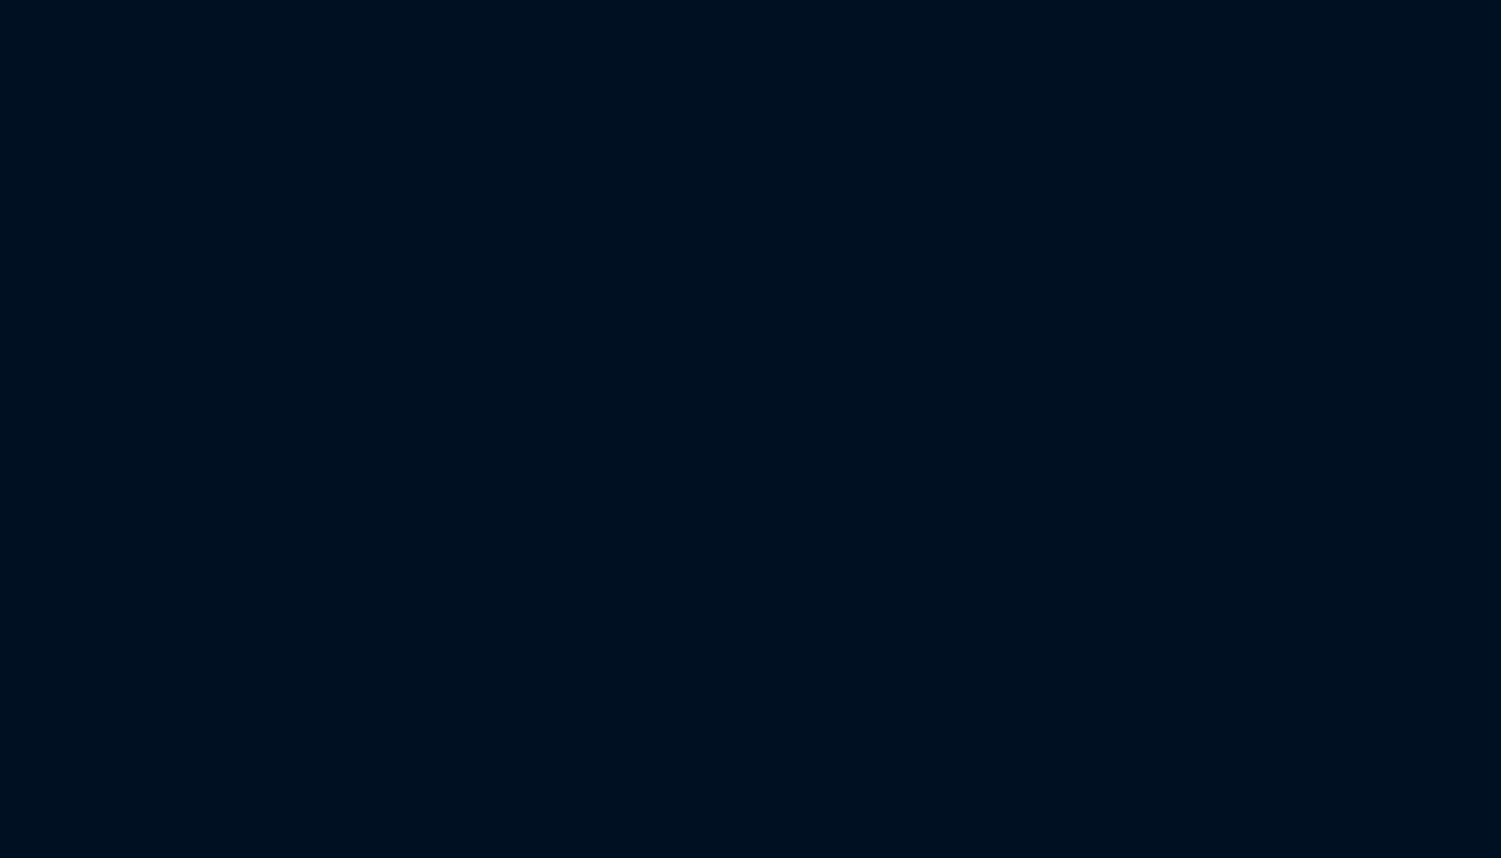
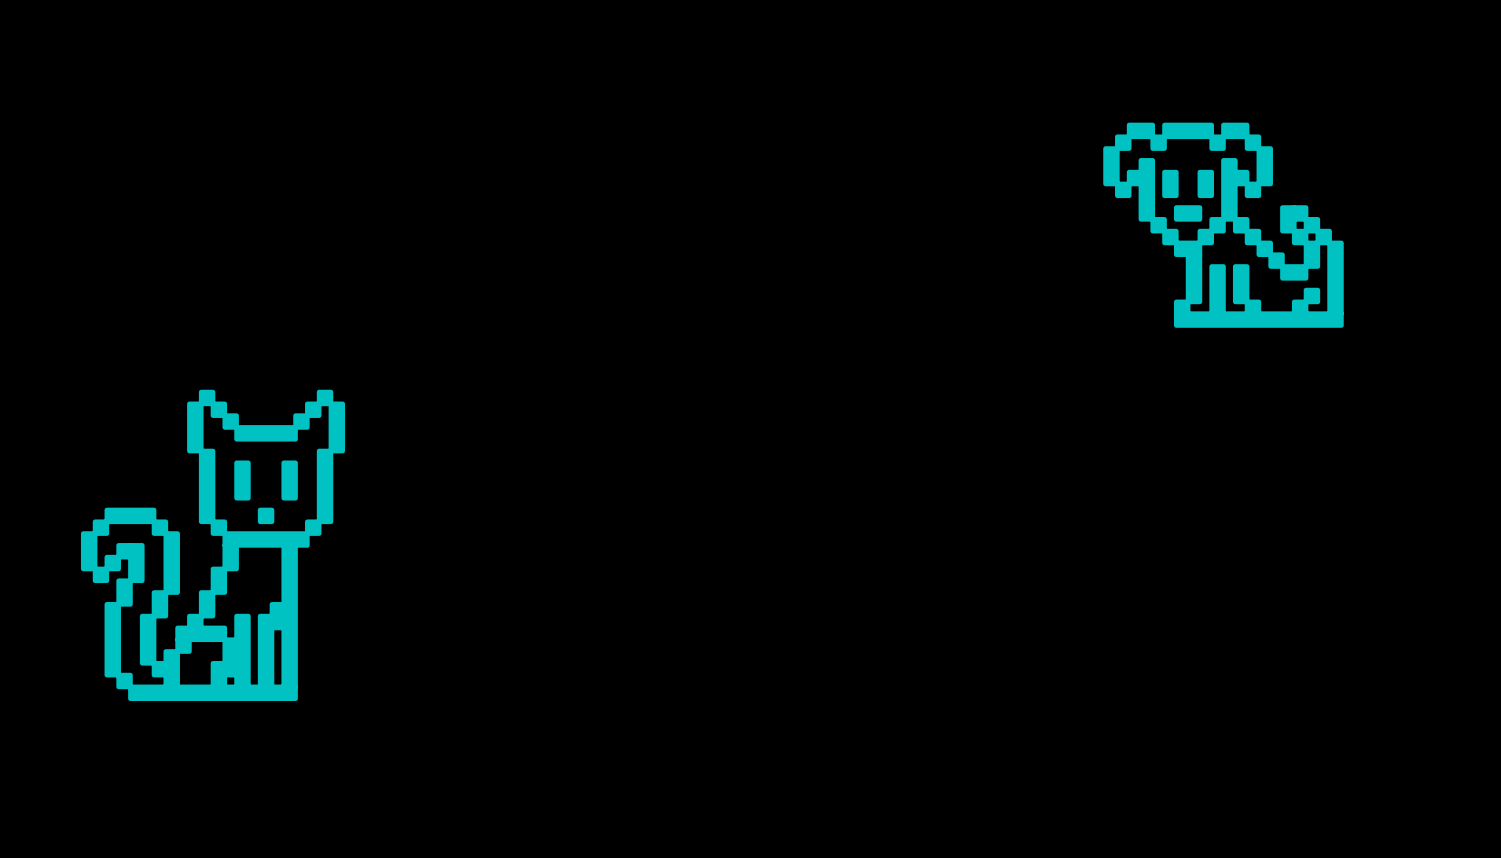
drawing: none -> [1103, 122, 1344, 328]
drawing: none -> [80, 389, 346, 701]

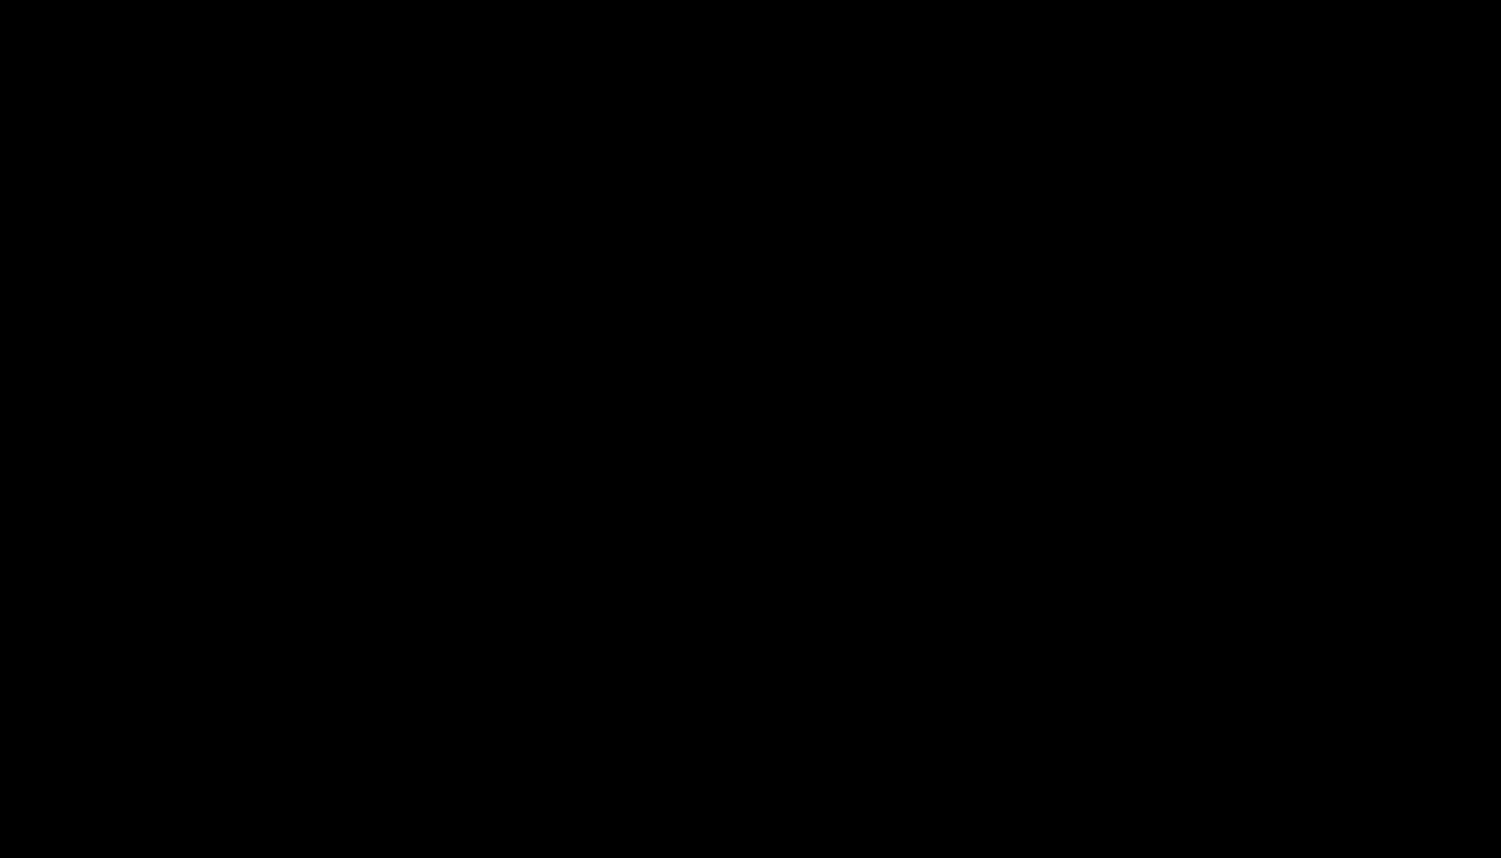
drawing: [1103, 122, 1344, 328] -> none
drawing: [80, 389, 346, 701] -> none

